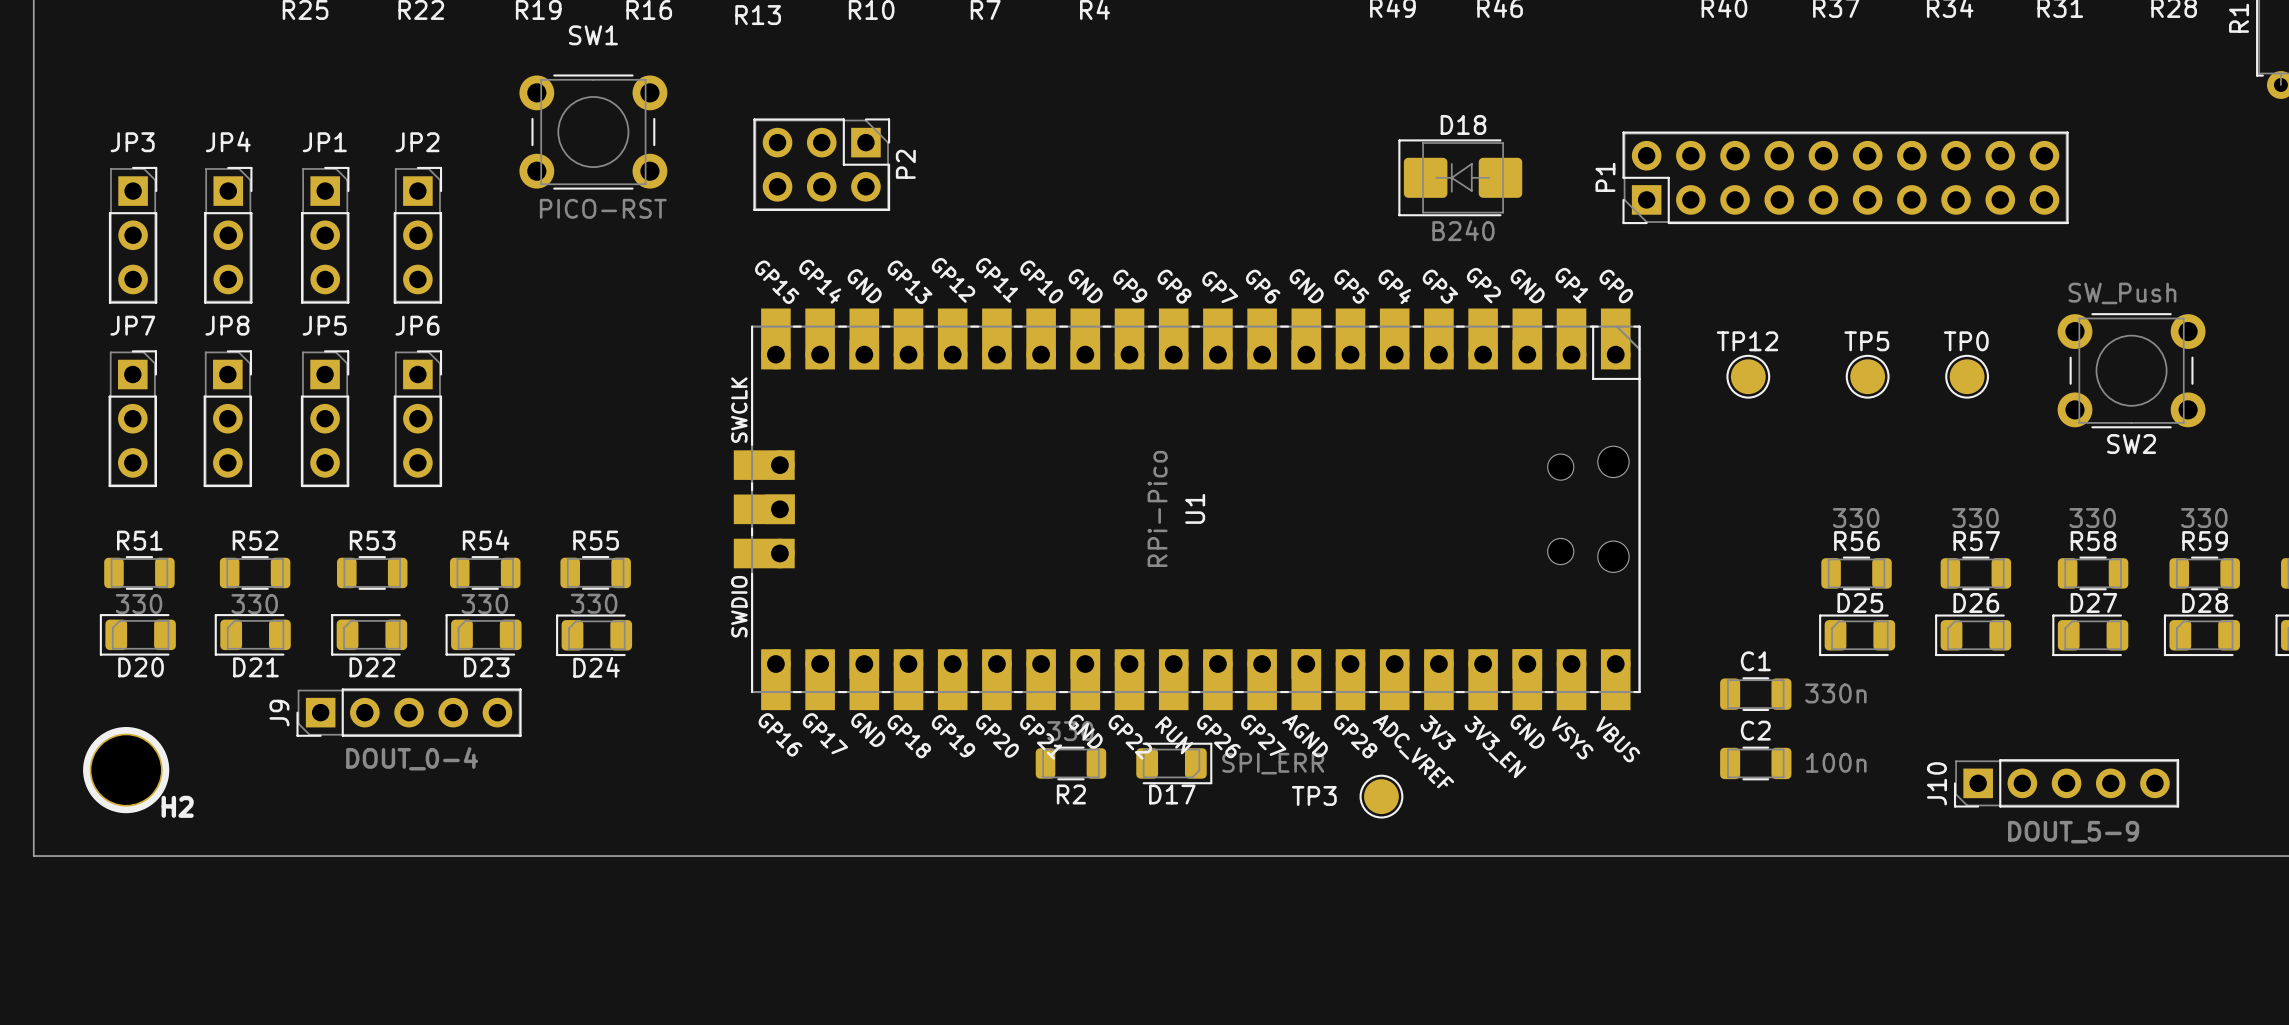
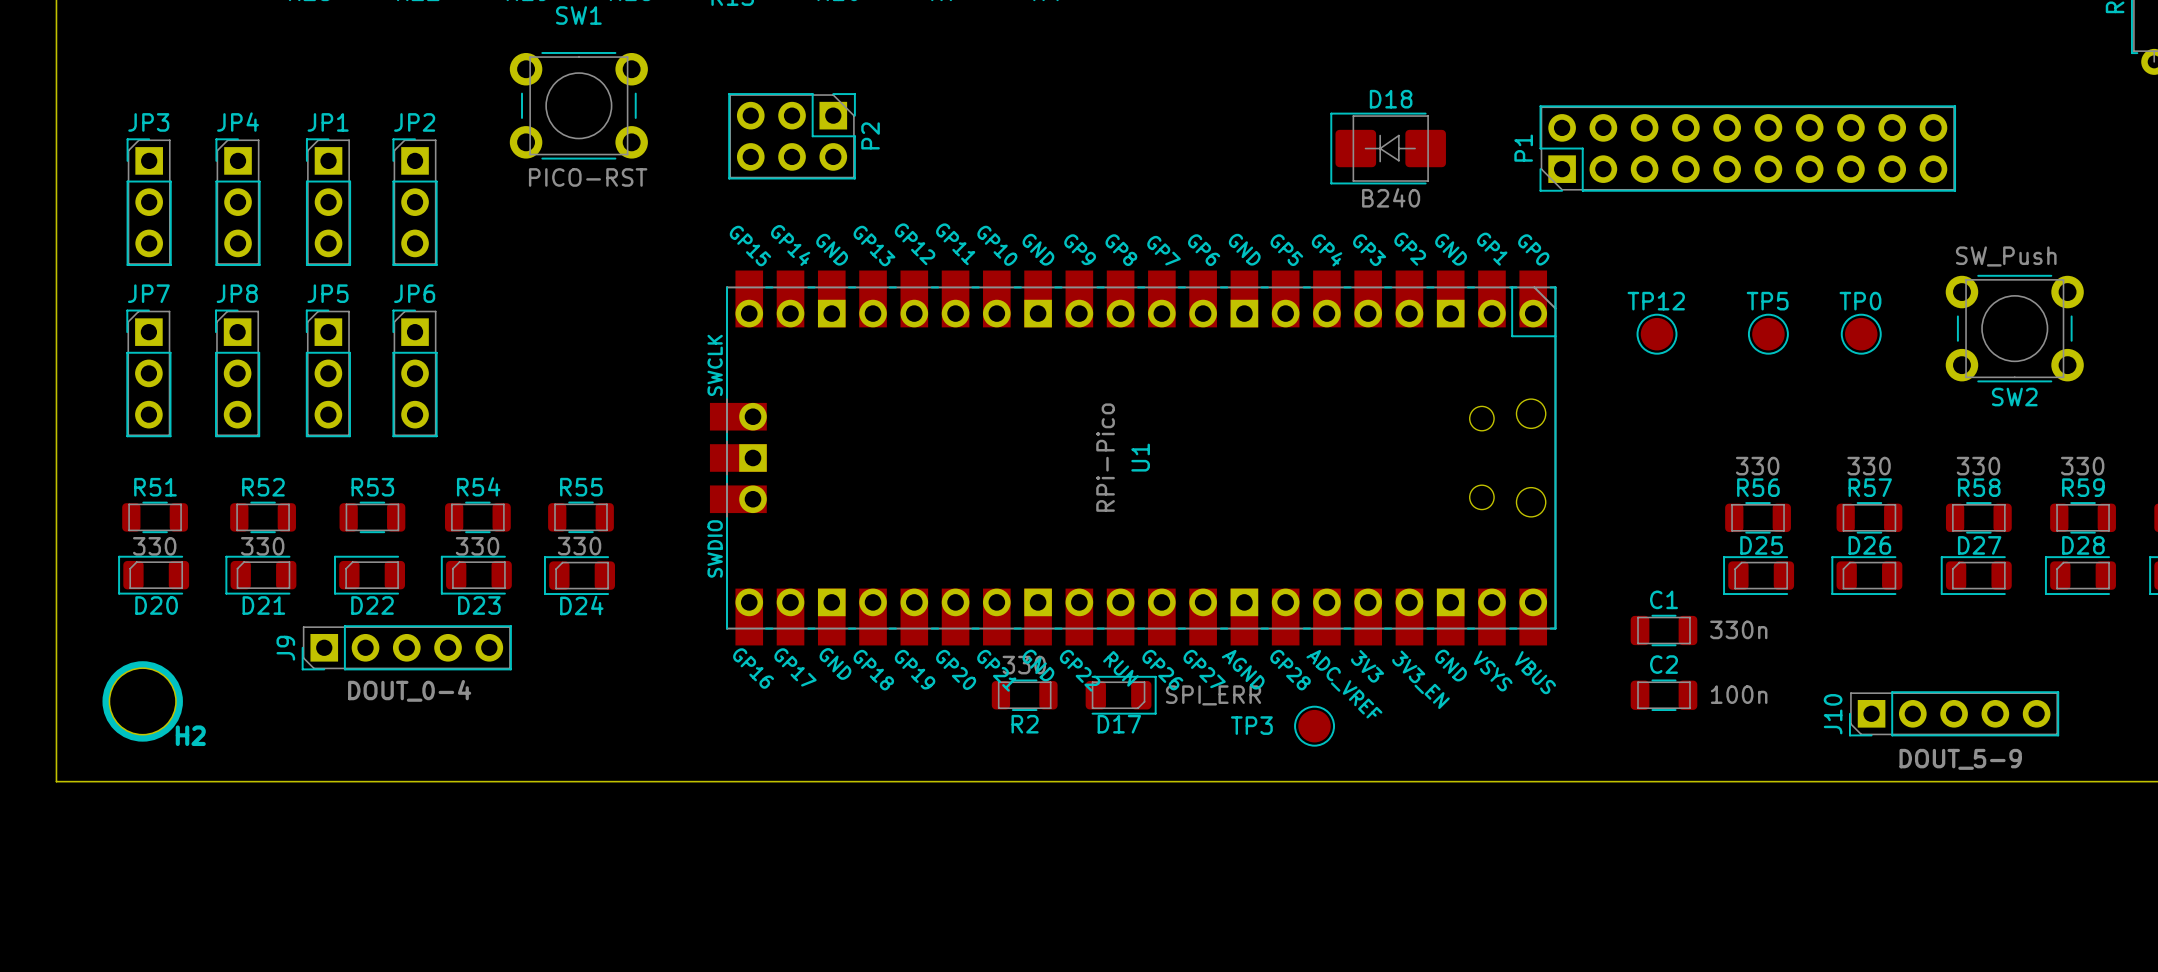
JP3 footprint: [108, 166, 158, 304] -> [126, 138, 172, 267]
JP4 footprint: [204, 166, 253, 304] -> [215, 138, 261, 267]
JP1 footprint: [301, 166, 350, 304] -> [305, 138, 352, 267]
JP2 footprint: [393, 166, 443, 304] -> [392, 138, 438, 267]
JP7 footprint: [108, 350, 157, 488] -> [126, 309, 172, 438]
JP8 footprint: [203, 350, 253, 488] -> [215, 309, 261, 438]
JP5 footprint: [300, 350, 350, 488] -> [305, 309, 351, 438]
JP6 footprint: [393, 350, 443, 488] -> [392, 309, 438, 438]

